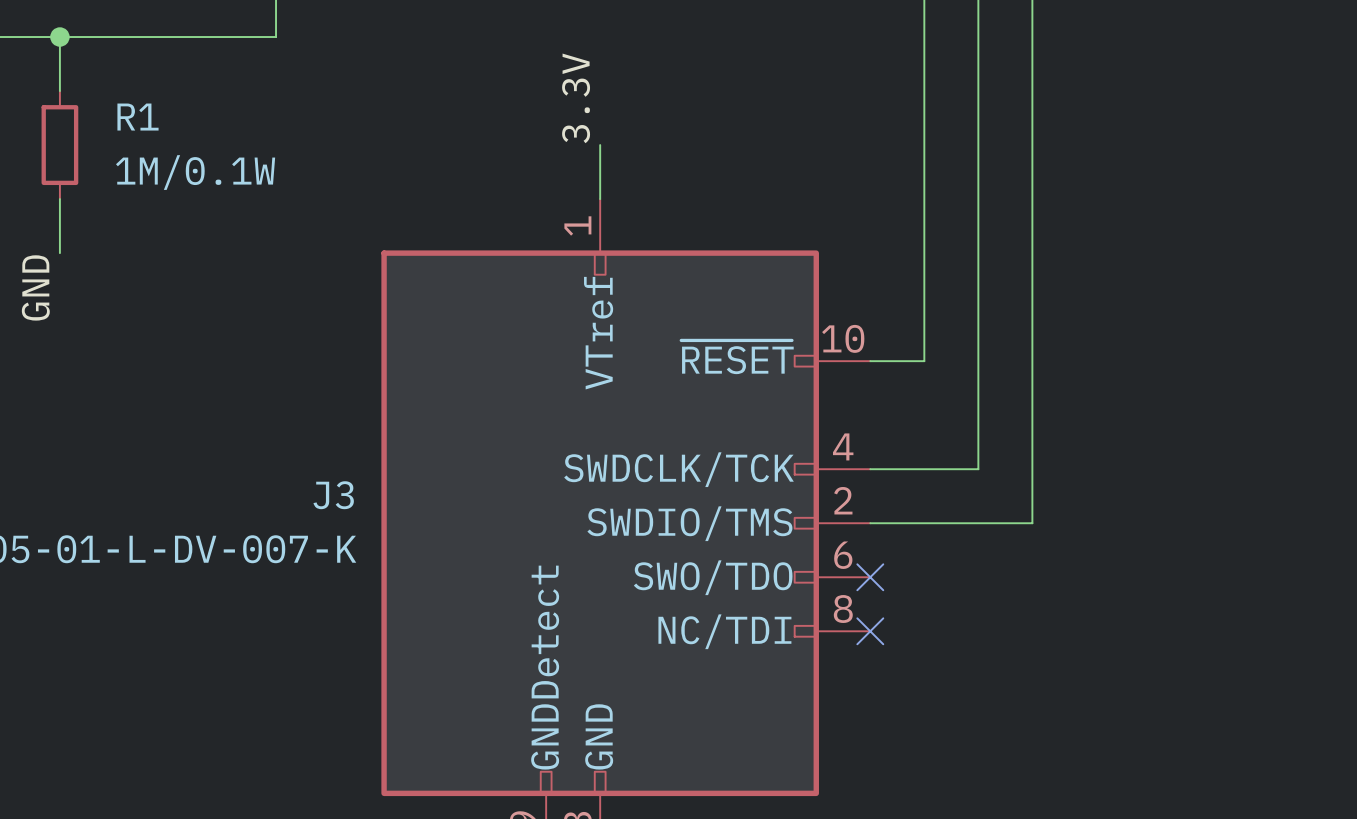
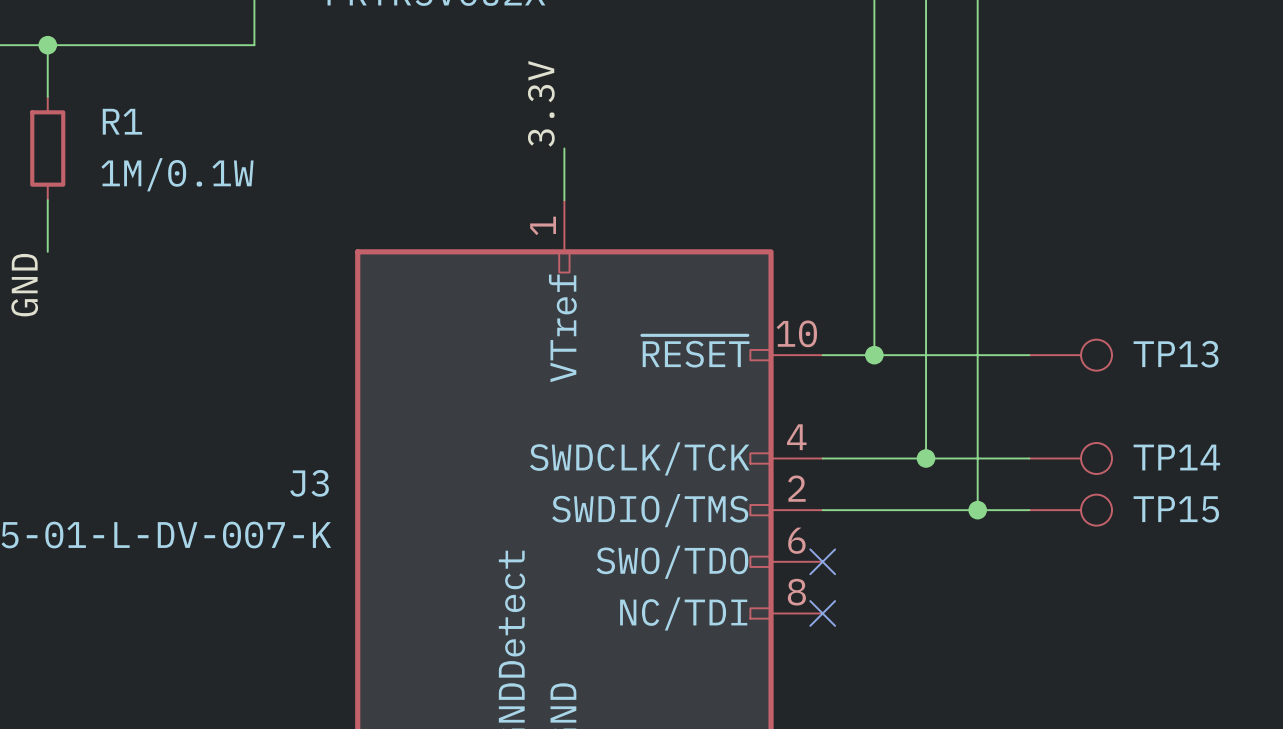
wire: none -> (874, 355) (1029, 355)
junction: none -> (874, 355)
TP13: none -> (1070, 355)
wire: none -> (926, 458) (1029, 458)
junction: none -> (926, 458)
TP14: none -> (1070, 458)
wire: none -> (977, 510) (1029, 510)
junction: none -> (977, 510)
TP15: none -> (1070, 510)

